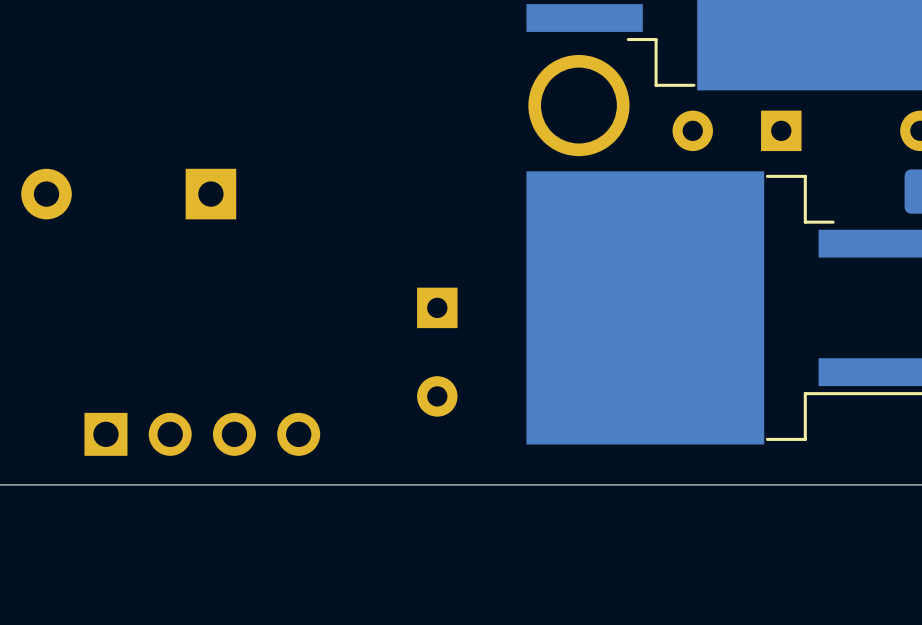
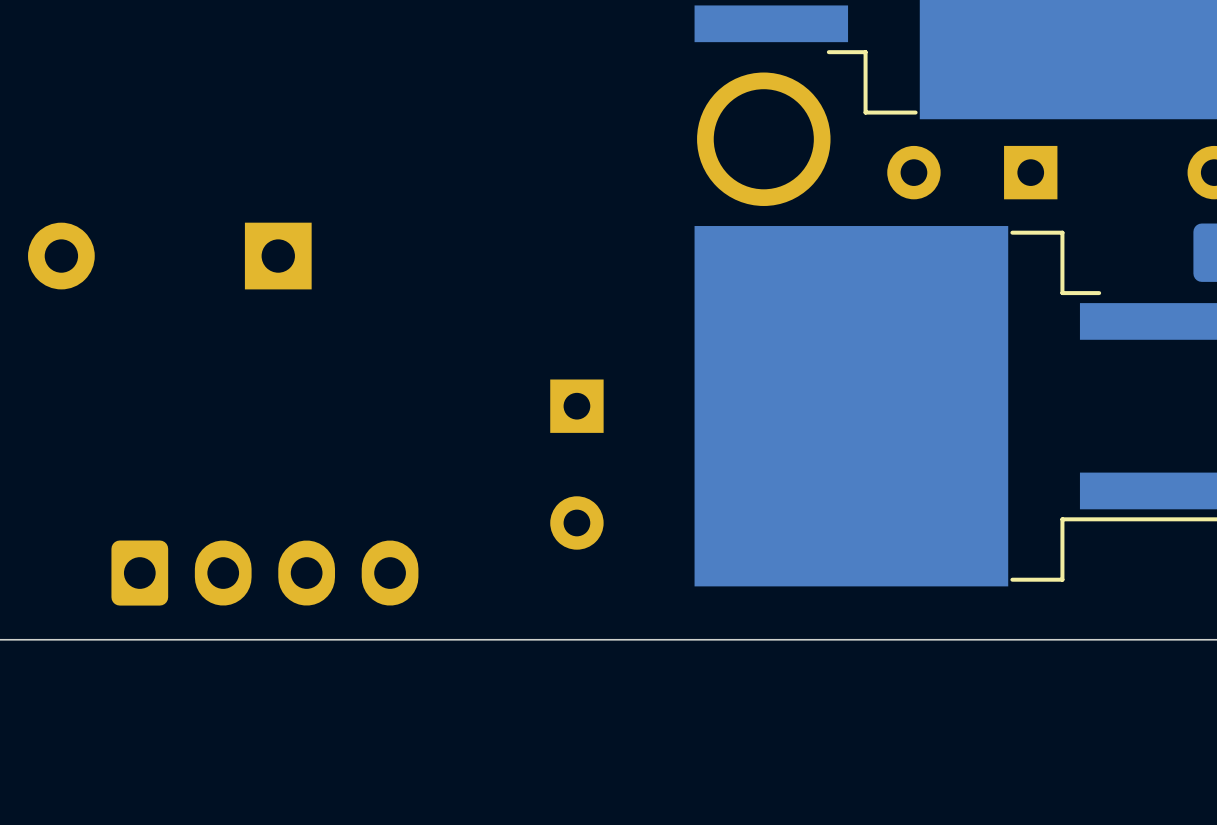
part footprint: [84, 412, 321, 456] -> [111, 540, 419, 606]

